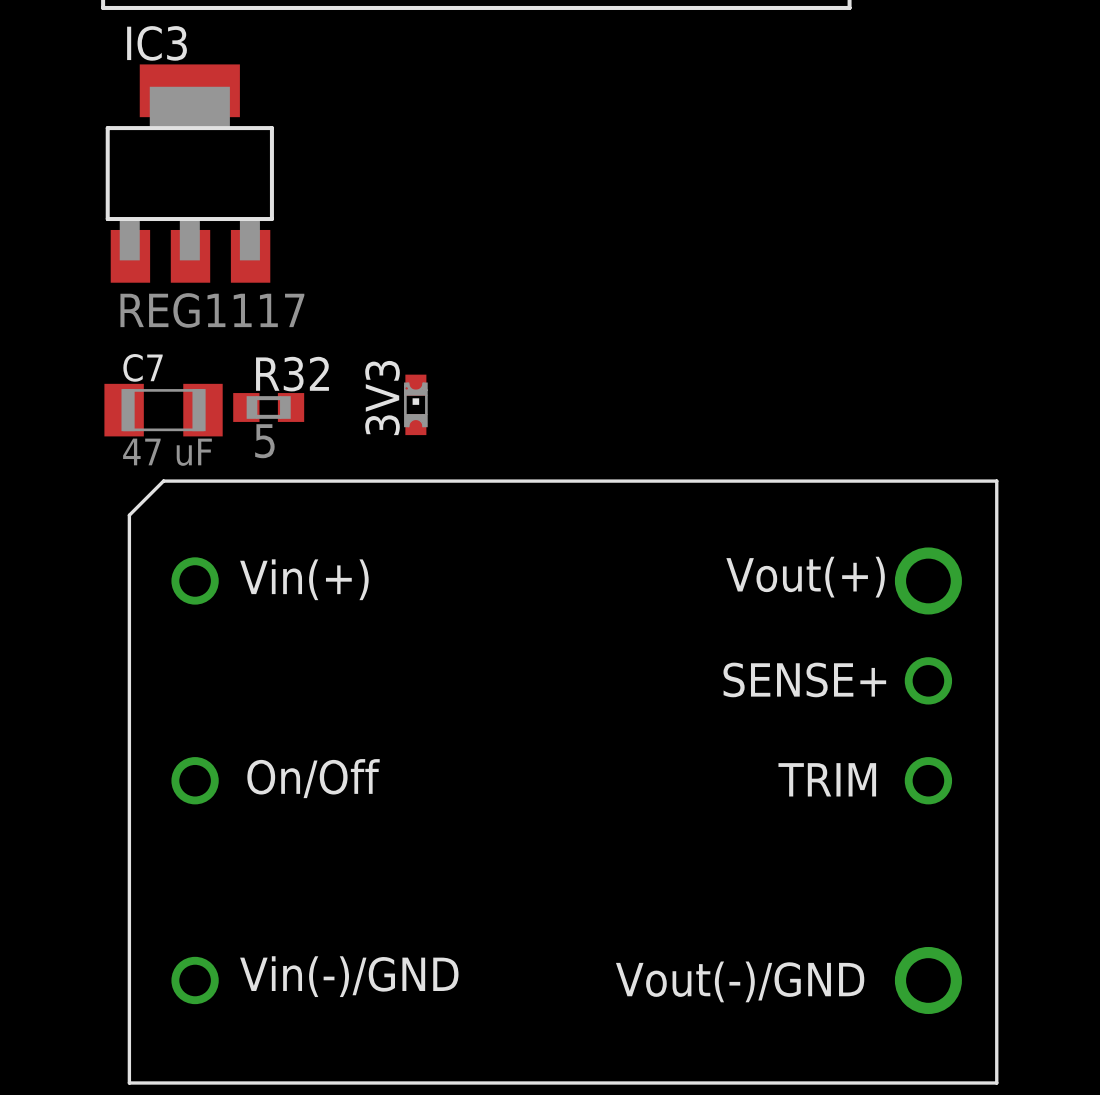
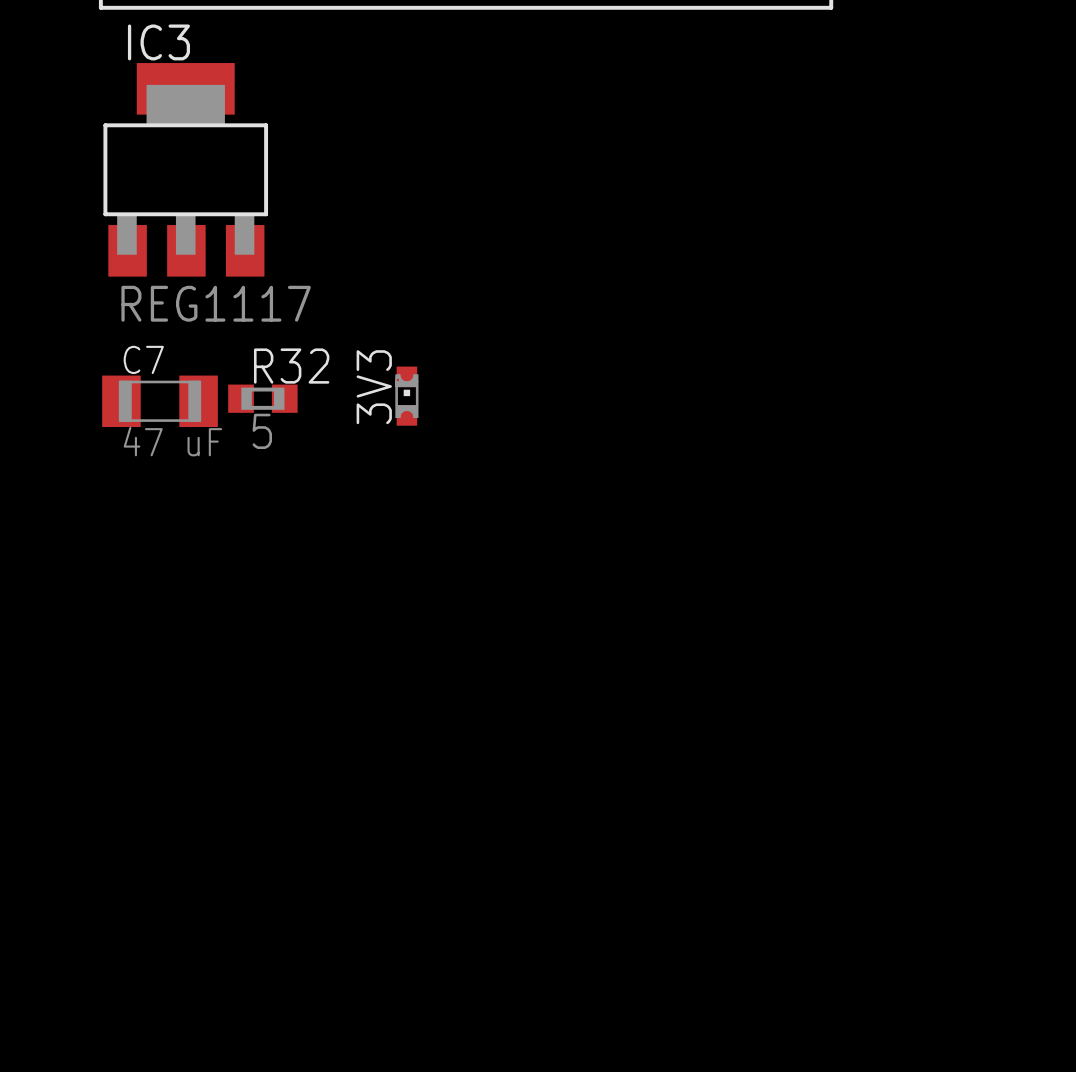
part: (563, 782) -> none

